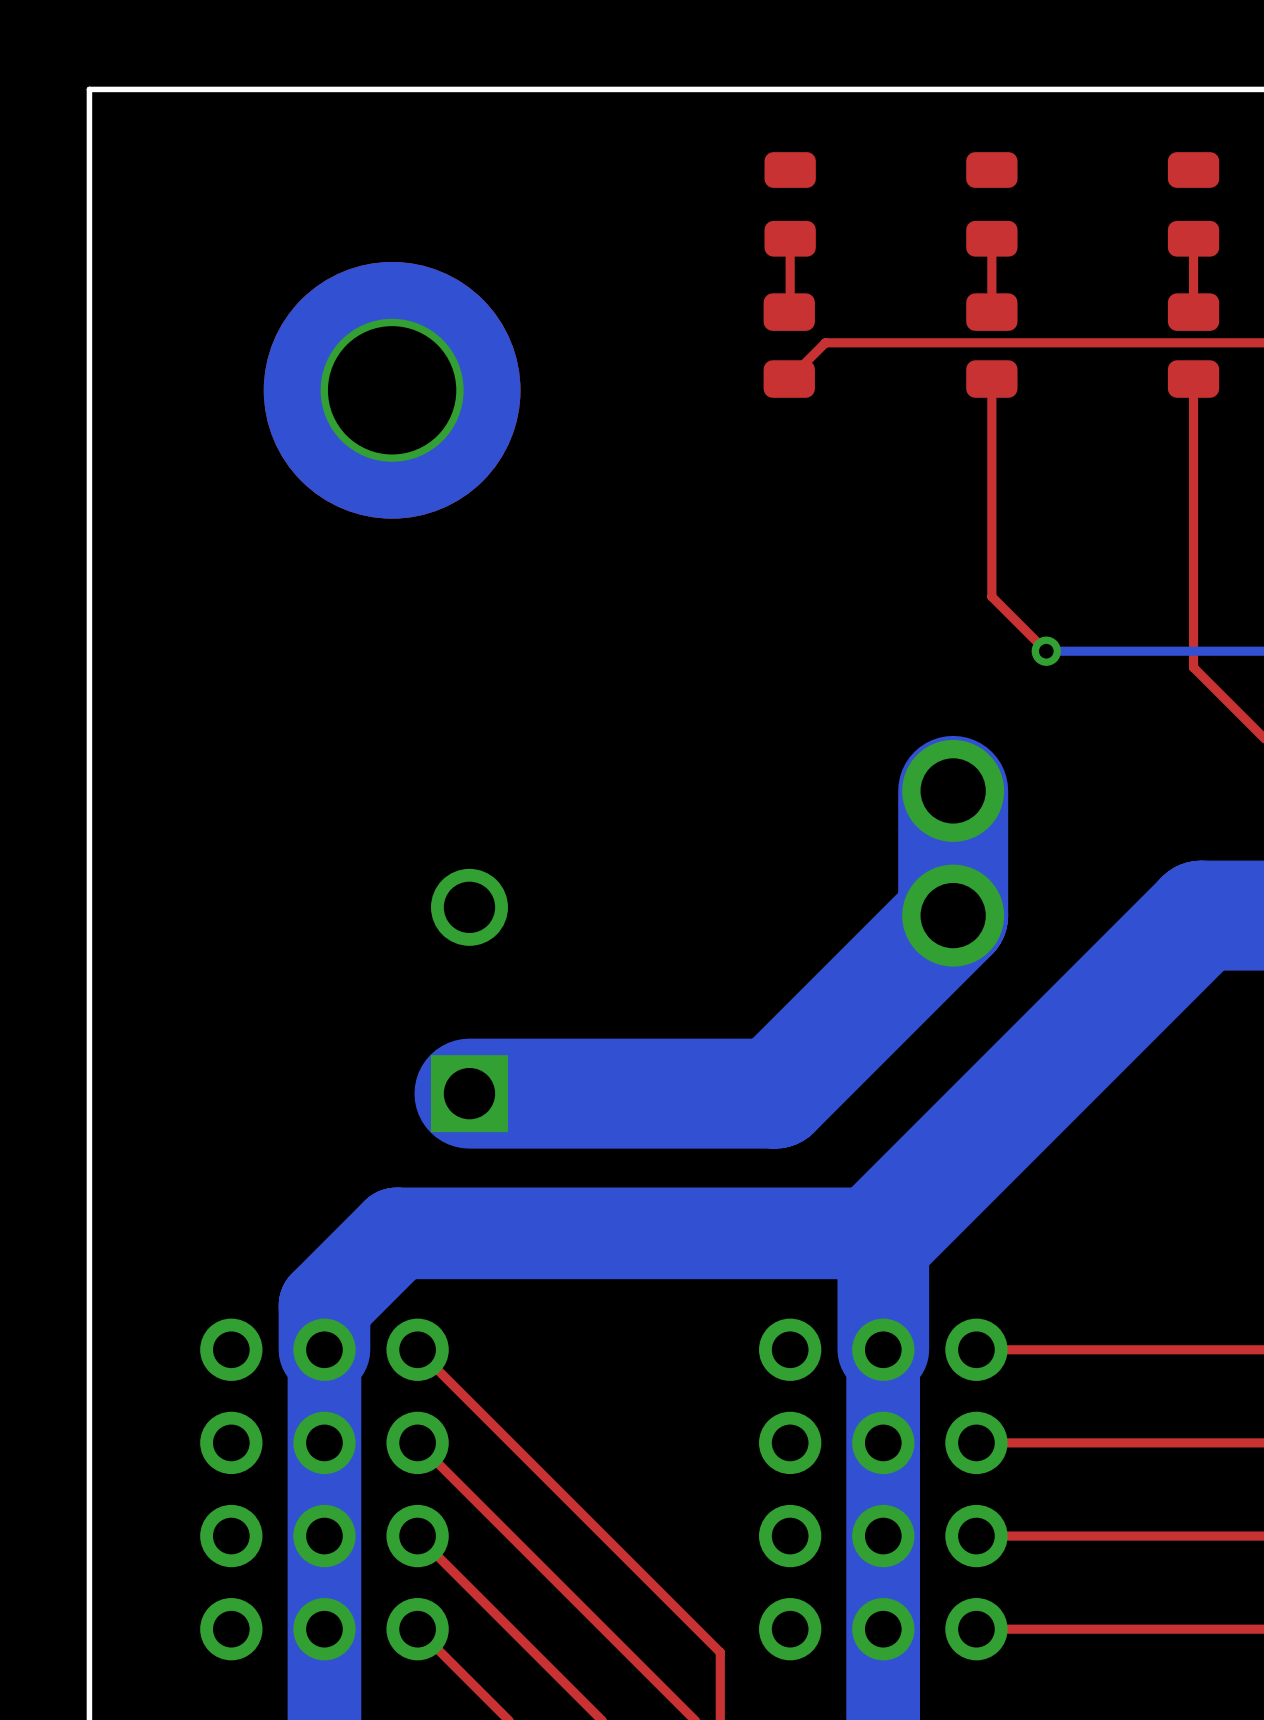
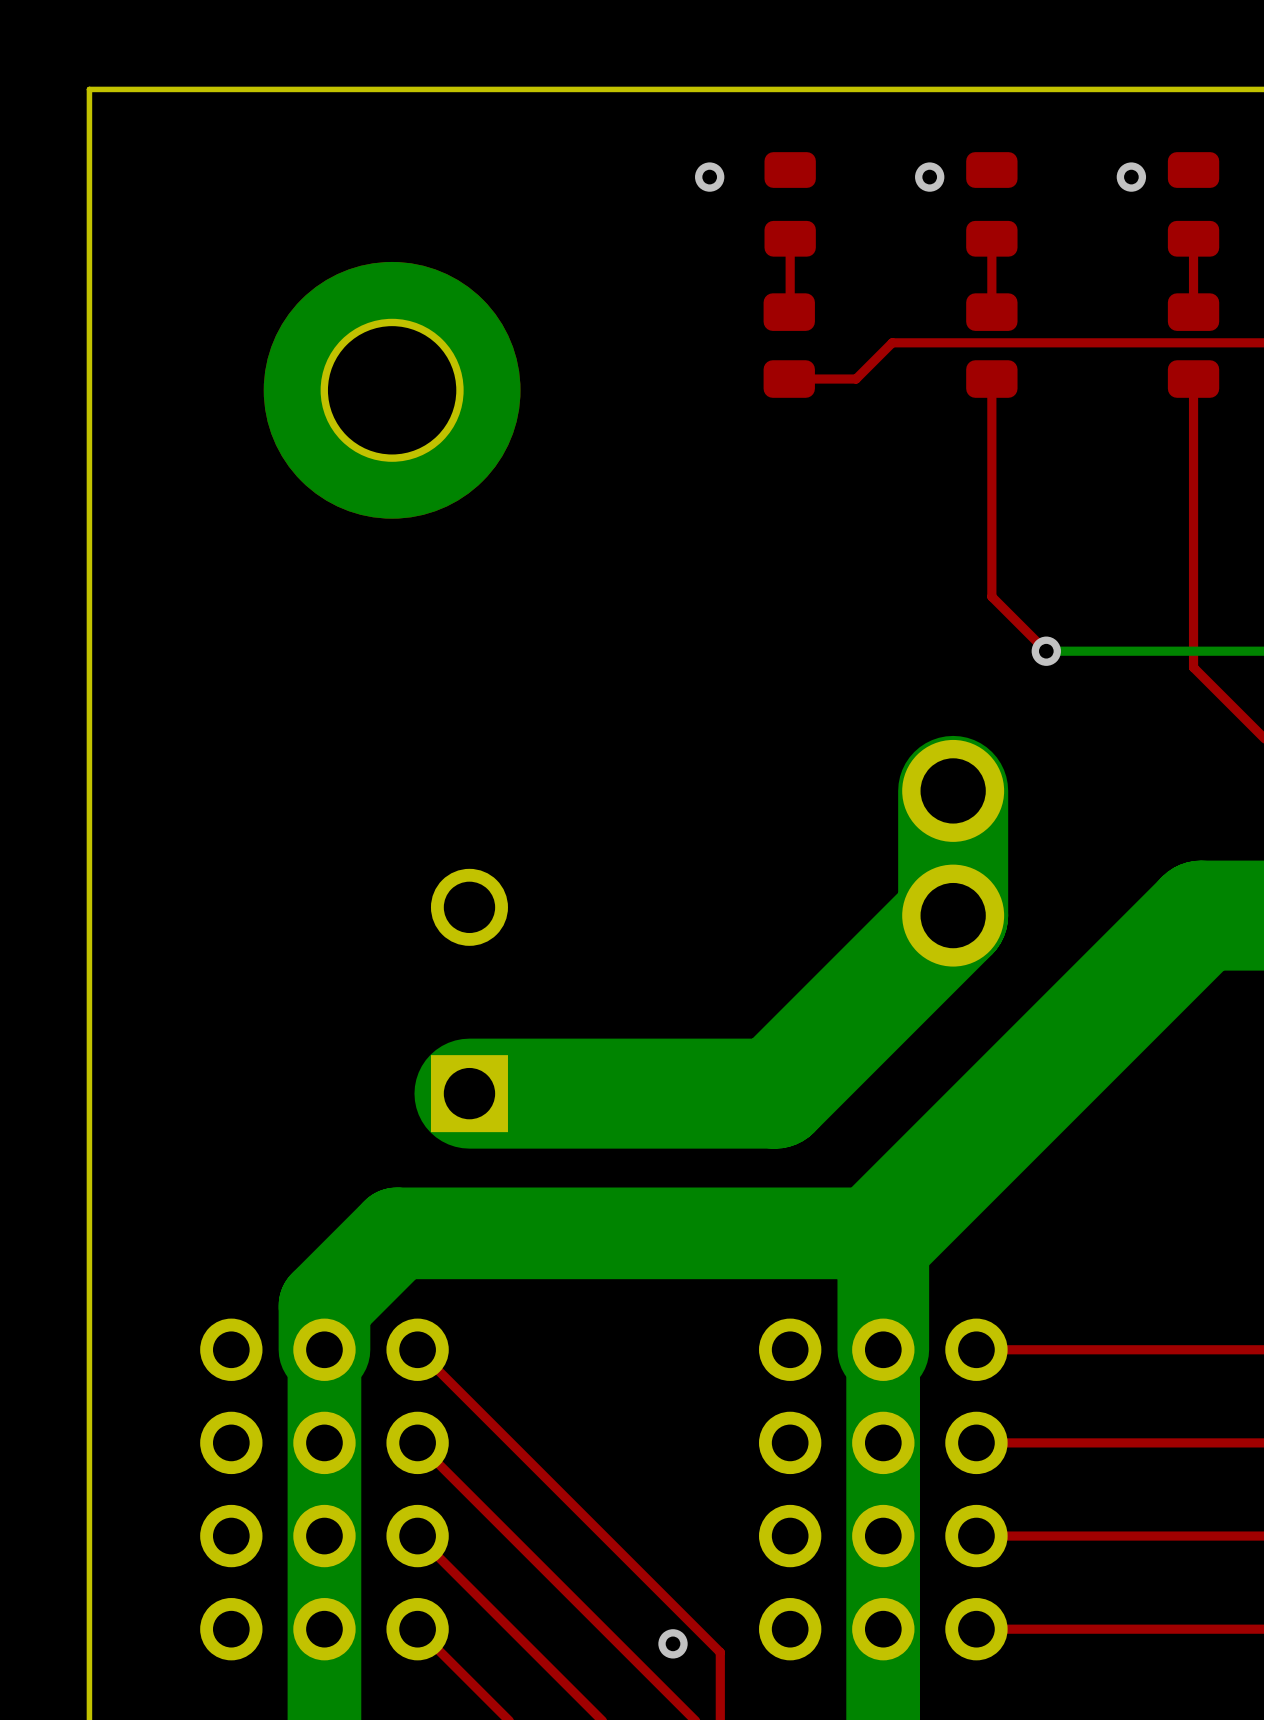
via: none -> (709, 177)
via: none -> (929, 177)
via: none -> (1131, 177)
top track: (892, 342) (825, 342) (789, 379) -> (892, 342) (856, 379) (789, 379)
via: none -> (673, 1643)

